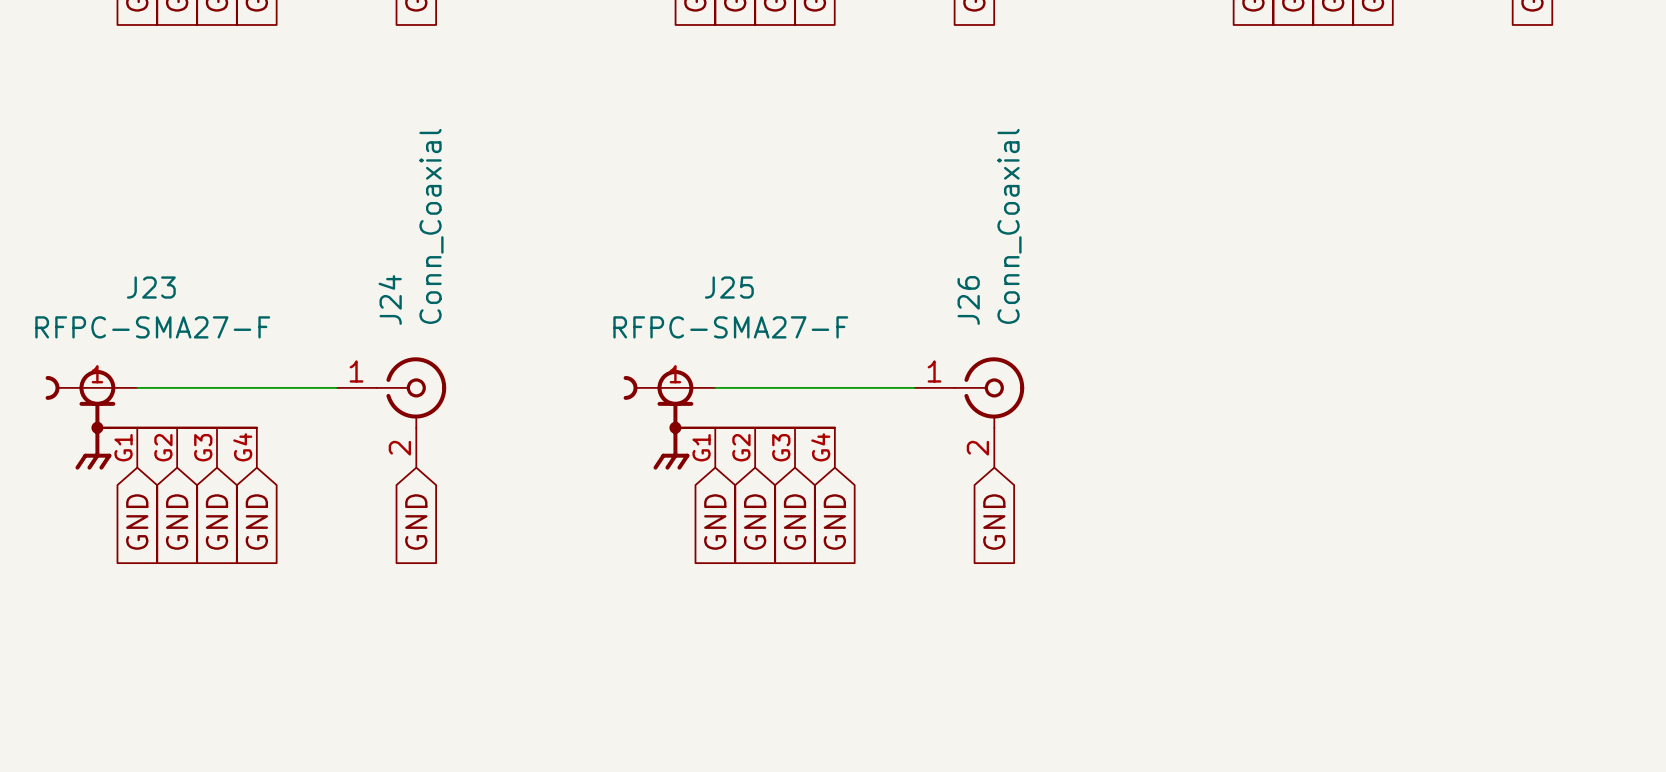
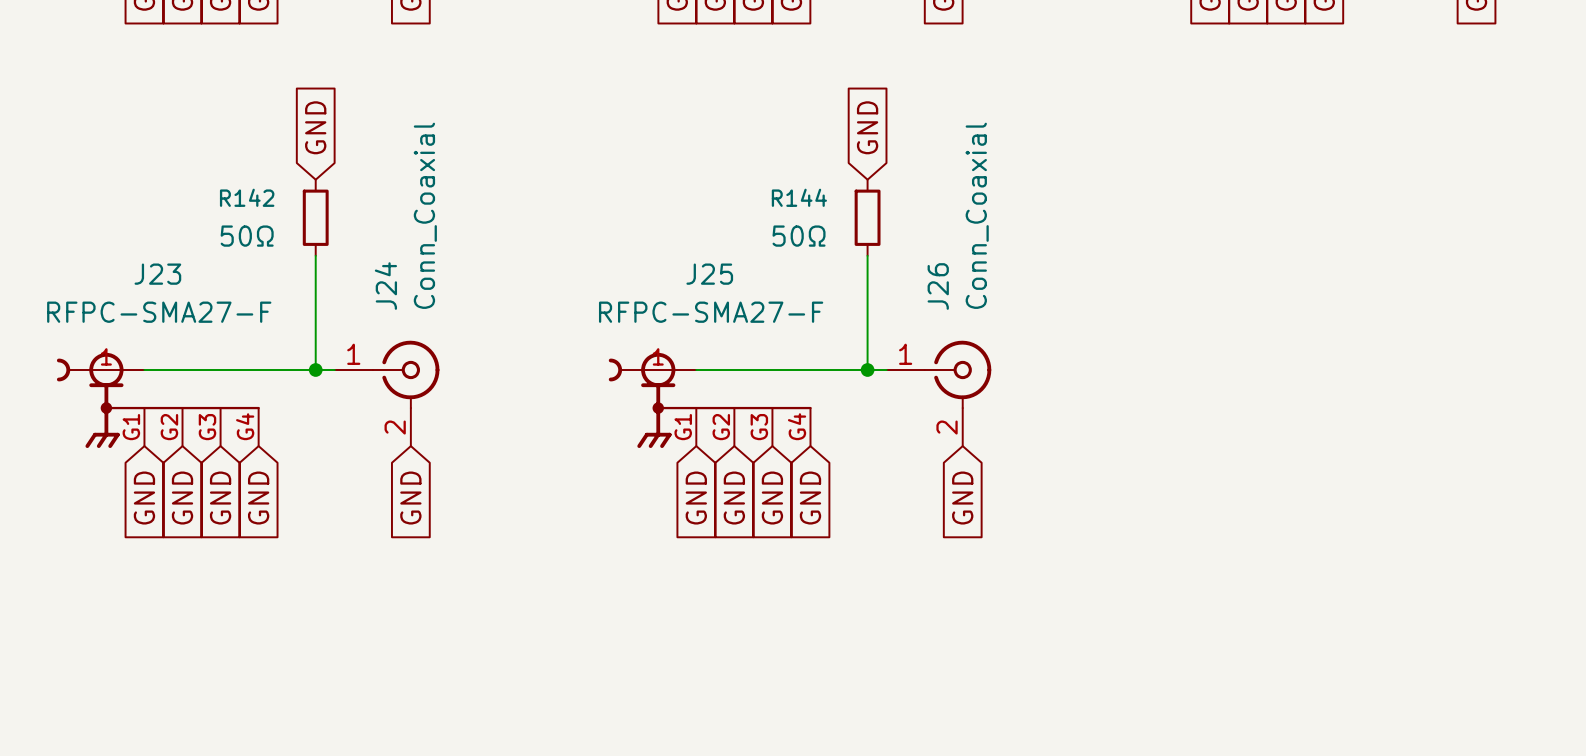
global label: none -> GND (315, 127)
global label: none -> GND (867, 127)
R142: none -> 50Ω (315, 217)
R144: none -> 50Ω (867, 217)
wire: none -> (315, 255) (315, 369)
wire: none -> (867, 255) (867, 369)
junction: none -> (315, 369)
junction: none -> (867, 369)

